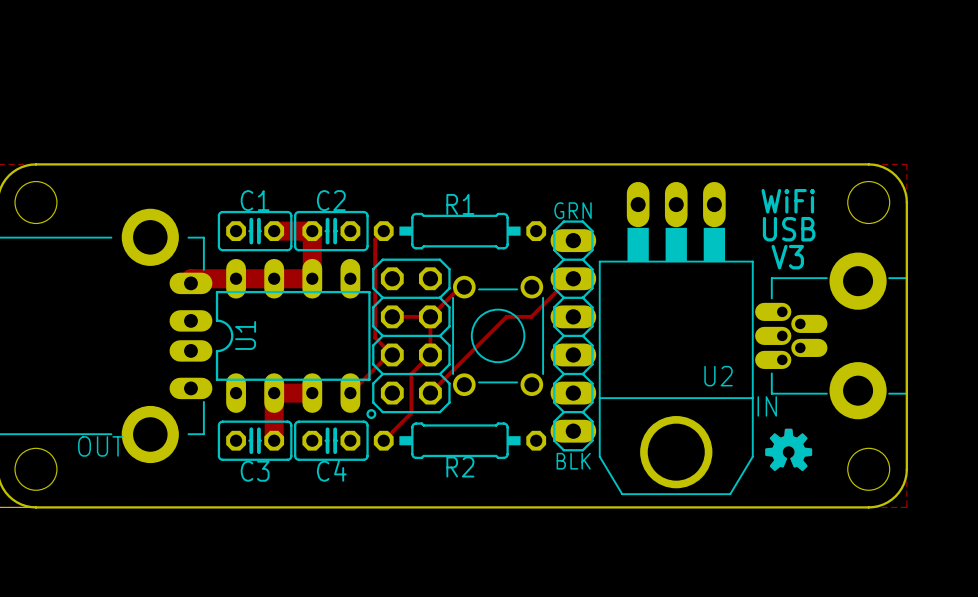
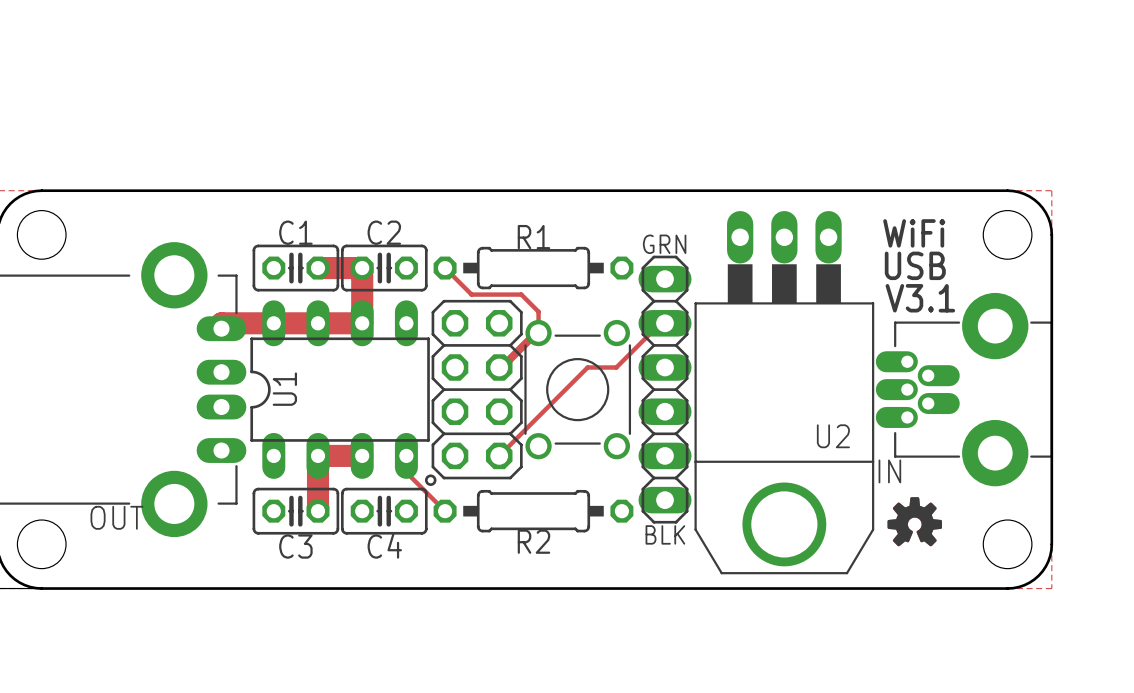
track: (383, 231) (375, 239) (375, 337) (392, 354) (388, 354) (350, 393) -> (445, 268) (471, 294) (521, 294) (538, 311) (538, 333) (504, 367) (499, 367)
text: V3 (787, 257) -> V3.1 (920, 298)
track: (392, 316) (430, 316) (430, 354) (411, 374) (411, 413) (383, 440) -> (406, 455) (406, 472) (445, 511)

